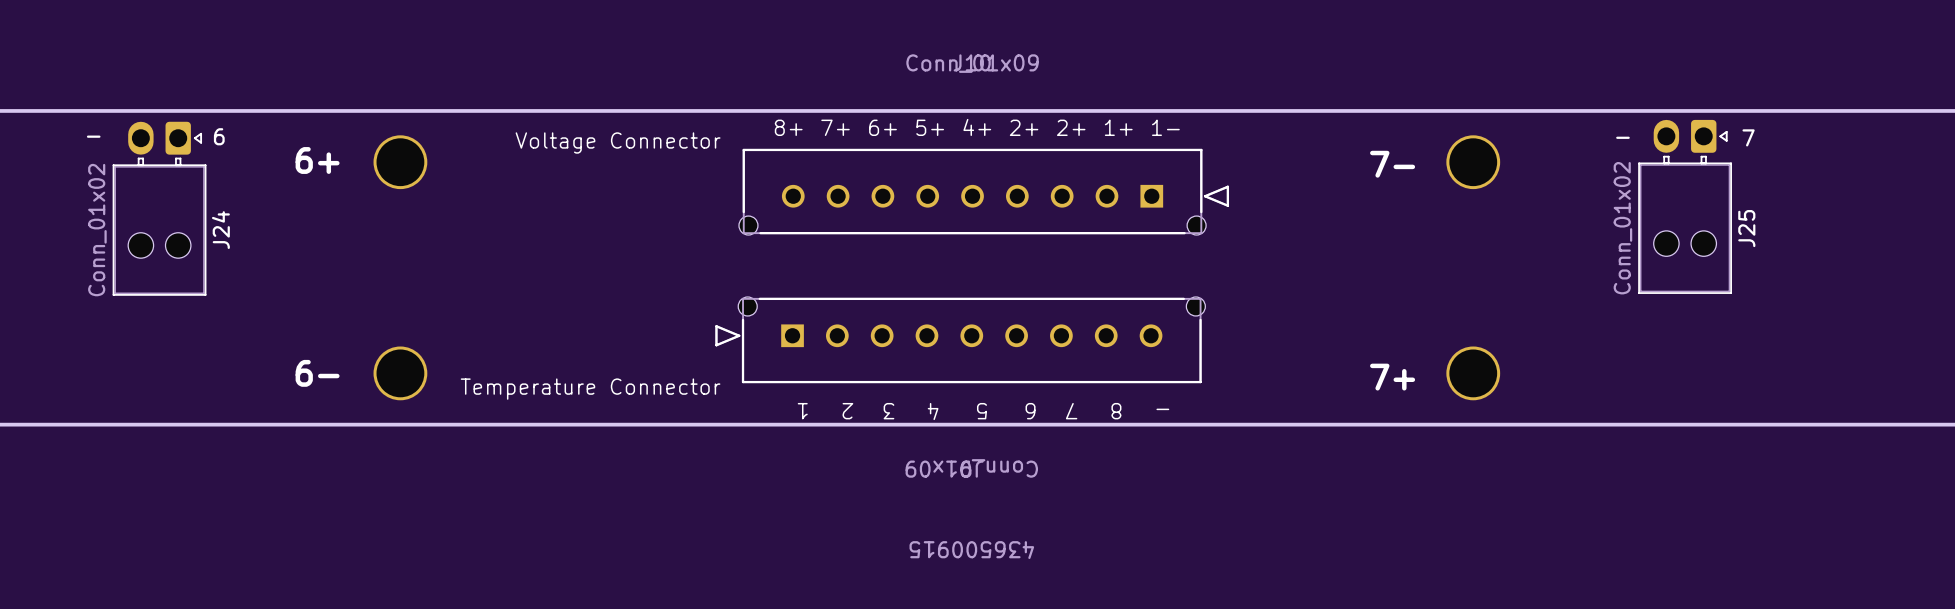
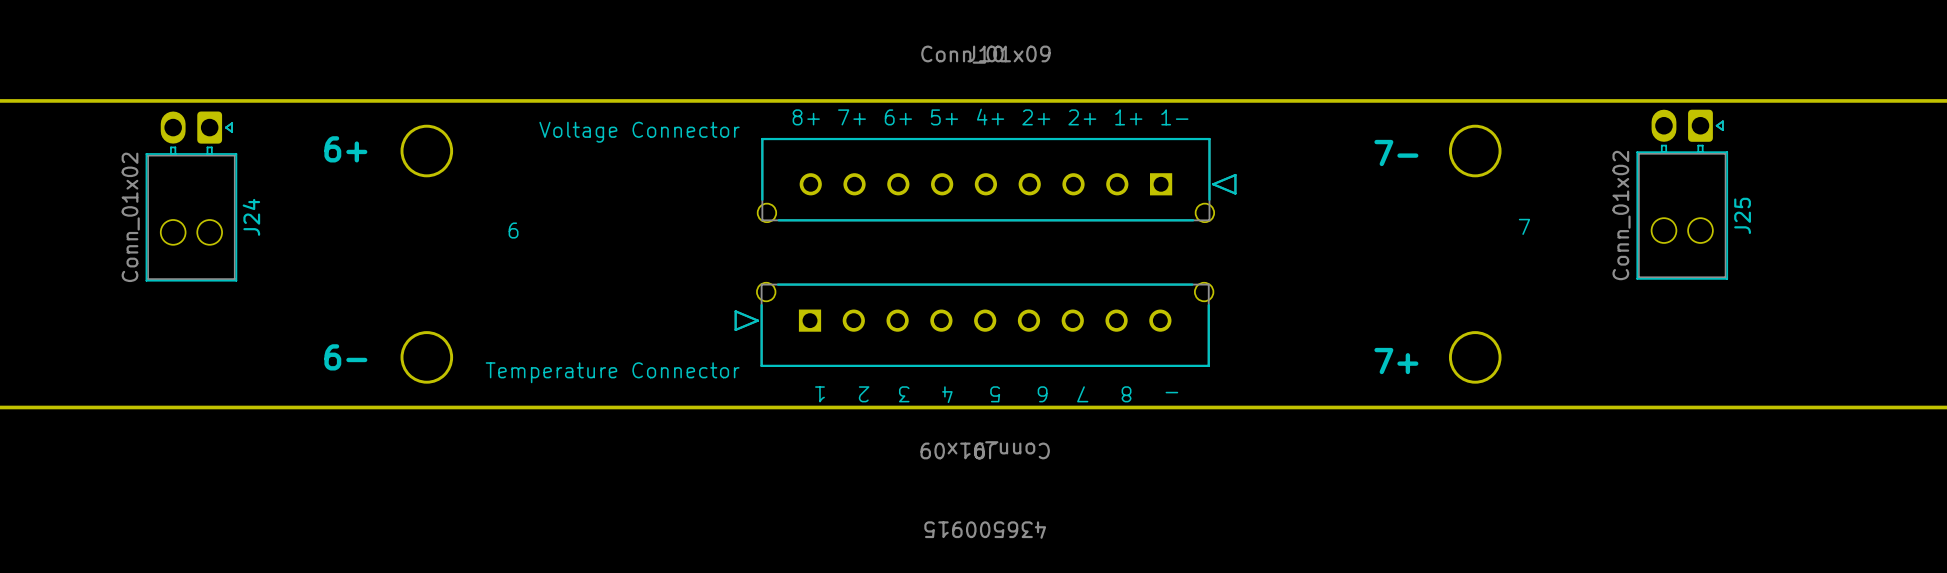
text: - (93, 136) -> none
text position: 6 (219, 136) -> 6 (513, 230)
text: - (1622, 137) -> none
text position: 7 (1748, 137) -> 7 (1524, 226)

